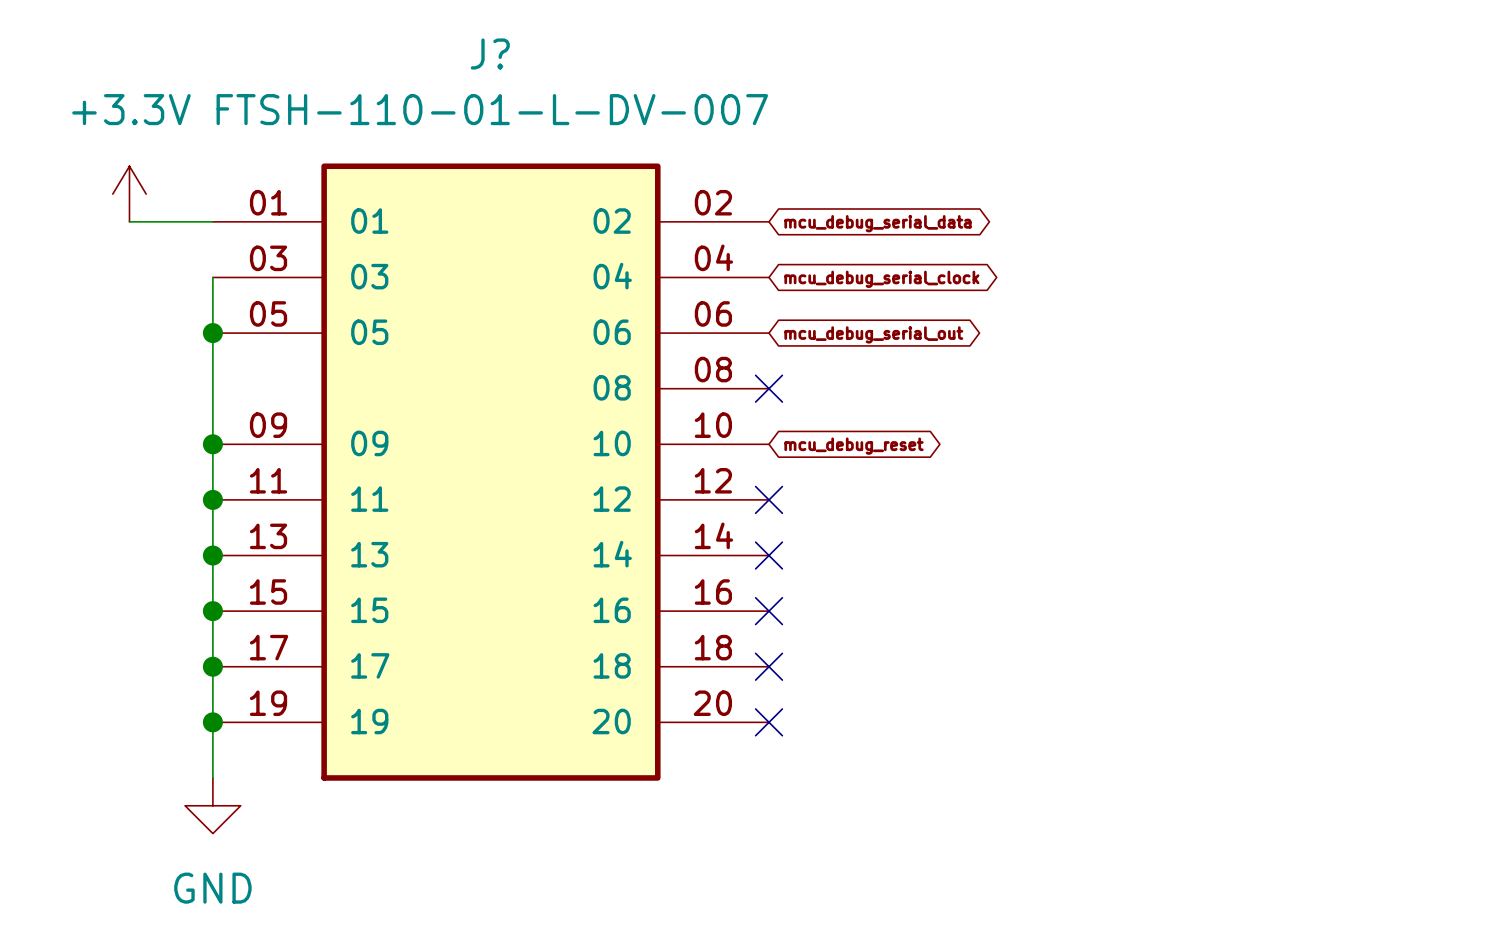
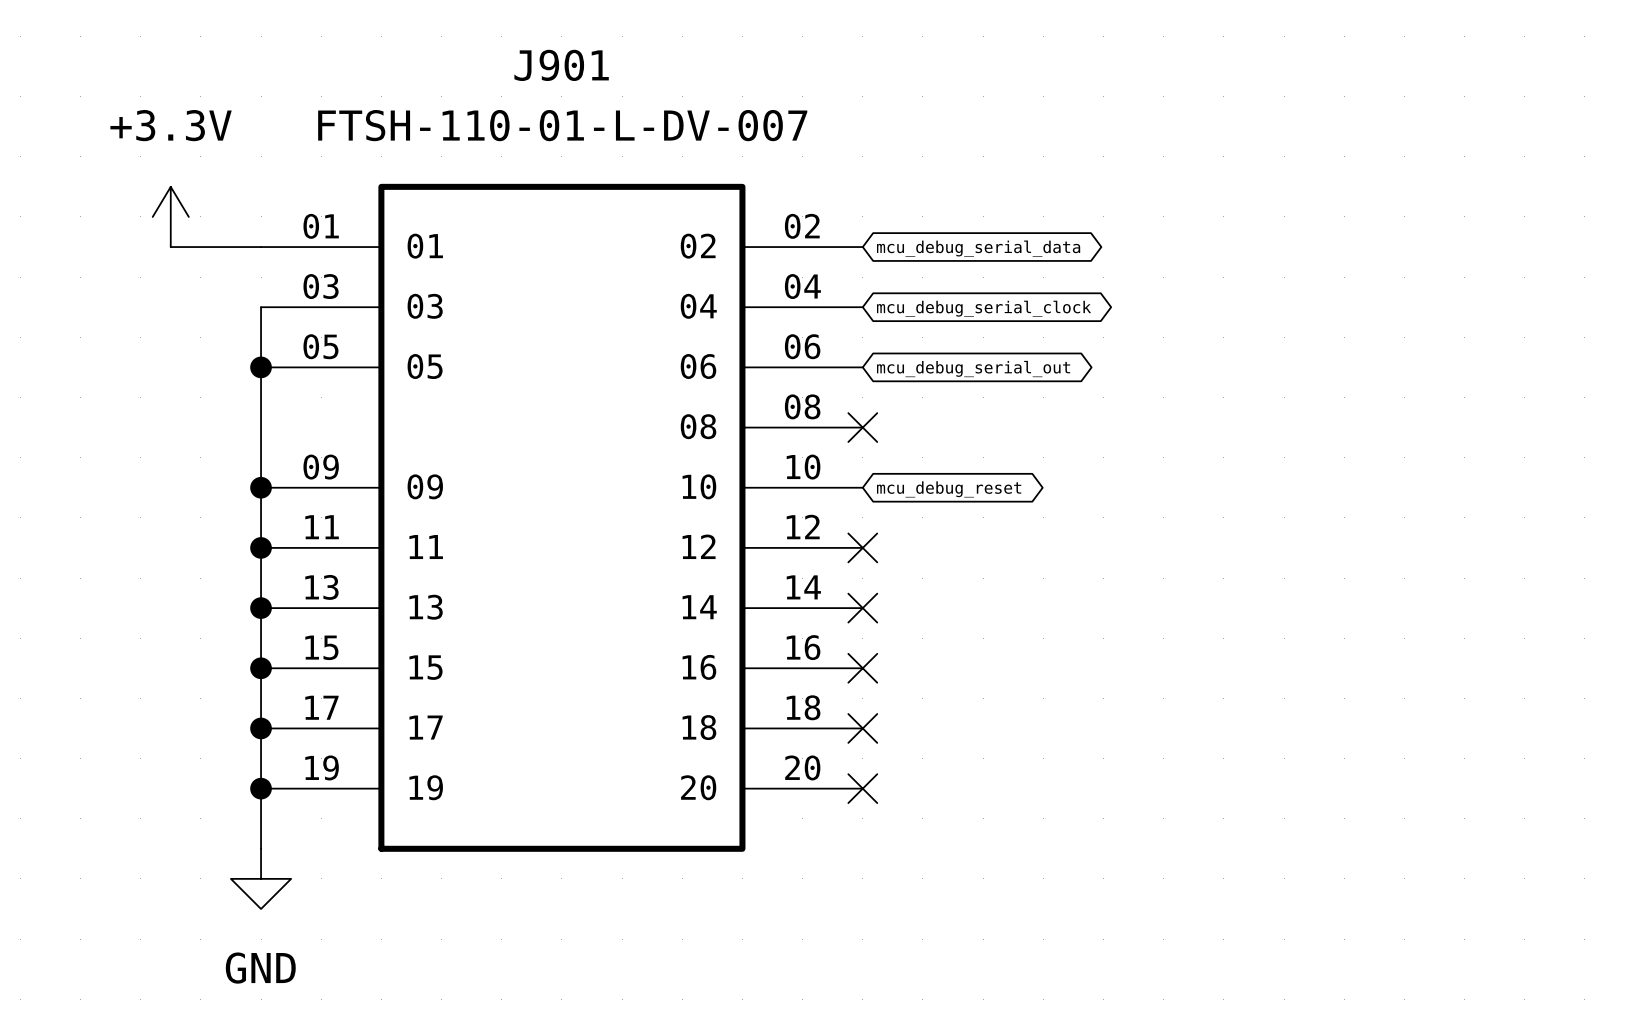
J? name: J? (490, 53) -> J901 (561, 65)

